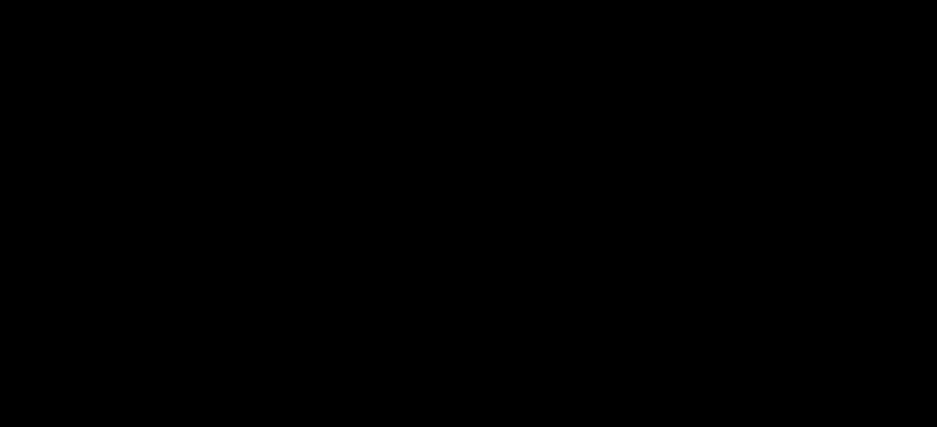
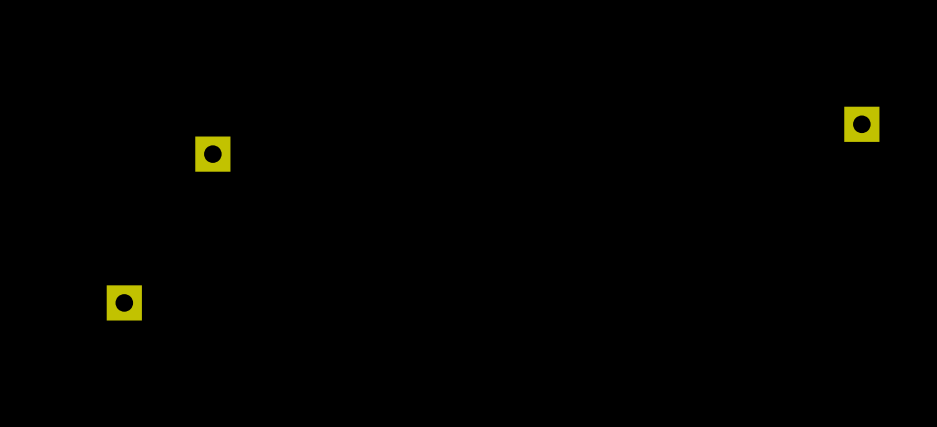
part: none -> (861, 124)
part: none -> (212, 154)
part: none -> (124, 302)

